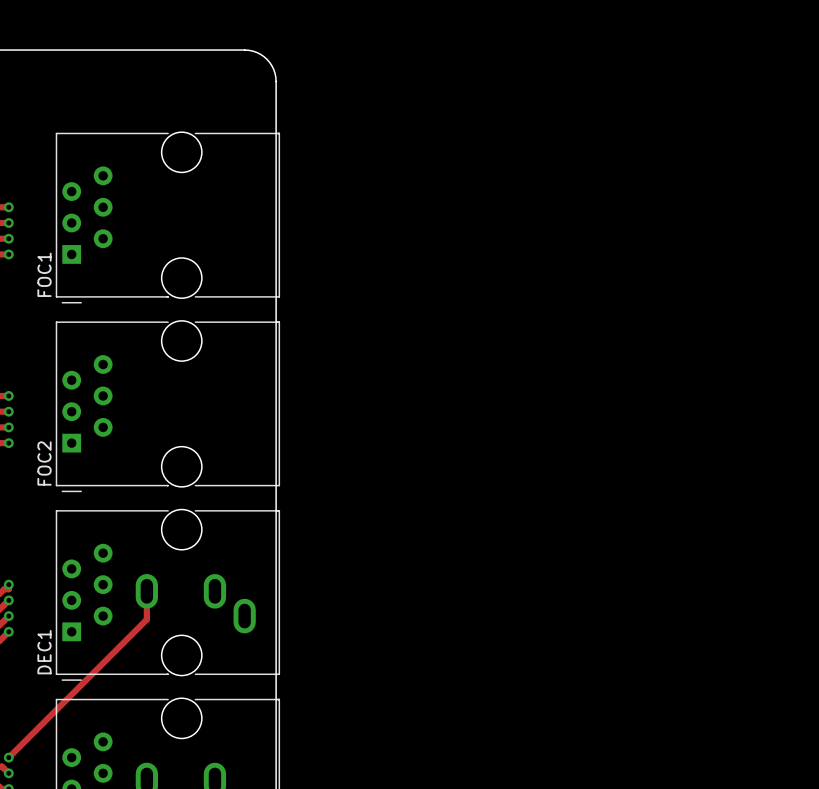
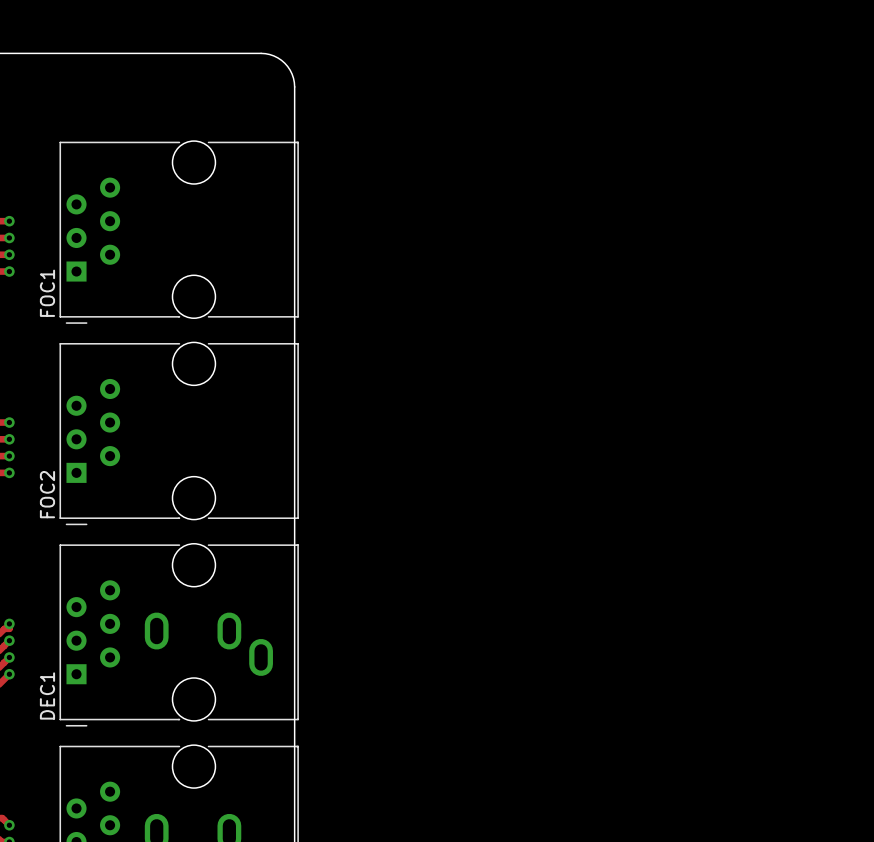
track: (146, 591) (146, 619) (8, 757) -> none
via: (8, 757) -> none

